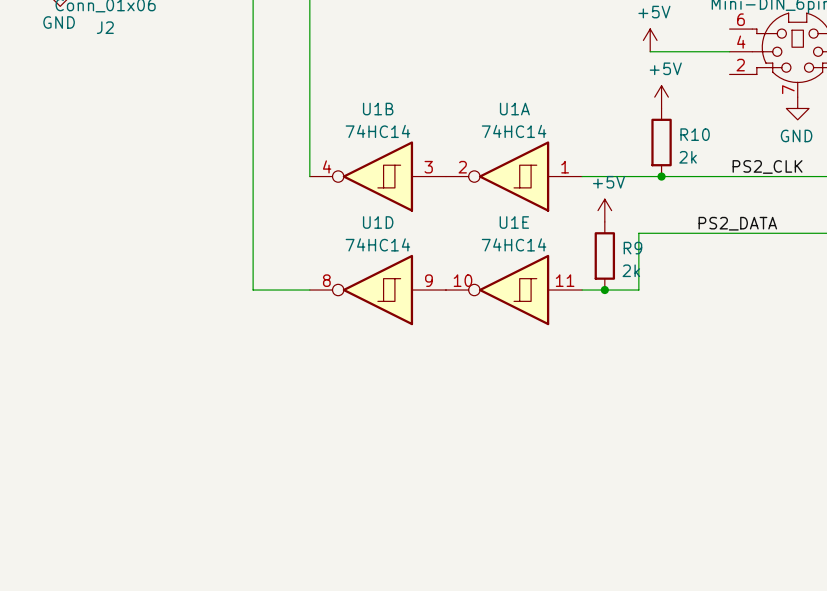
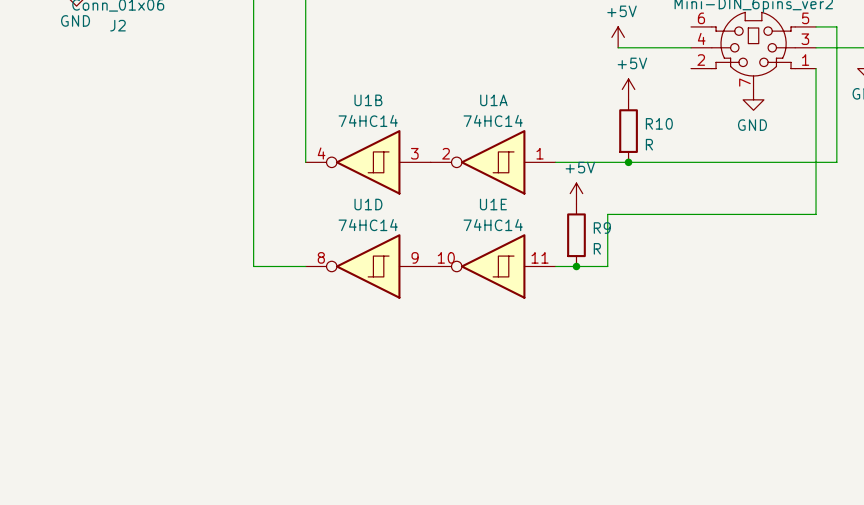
R10 value: 2k (688, 157) -> R (649, 144)
label: PS2_CLK (767, 166) -> none
label: PS2_DATA (737, 223) -> none
R9 value: 2k (631, 270) -> R (597, 248)

